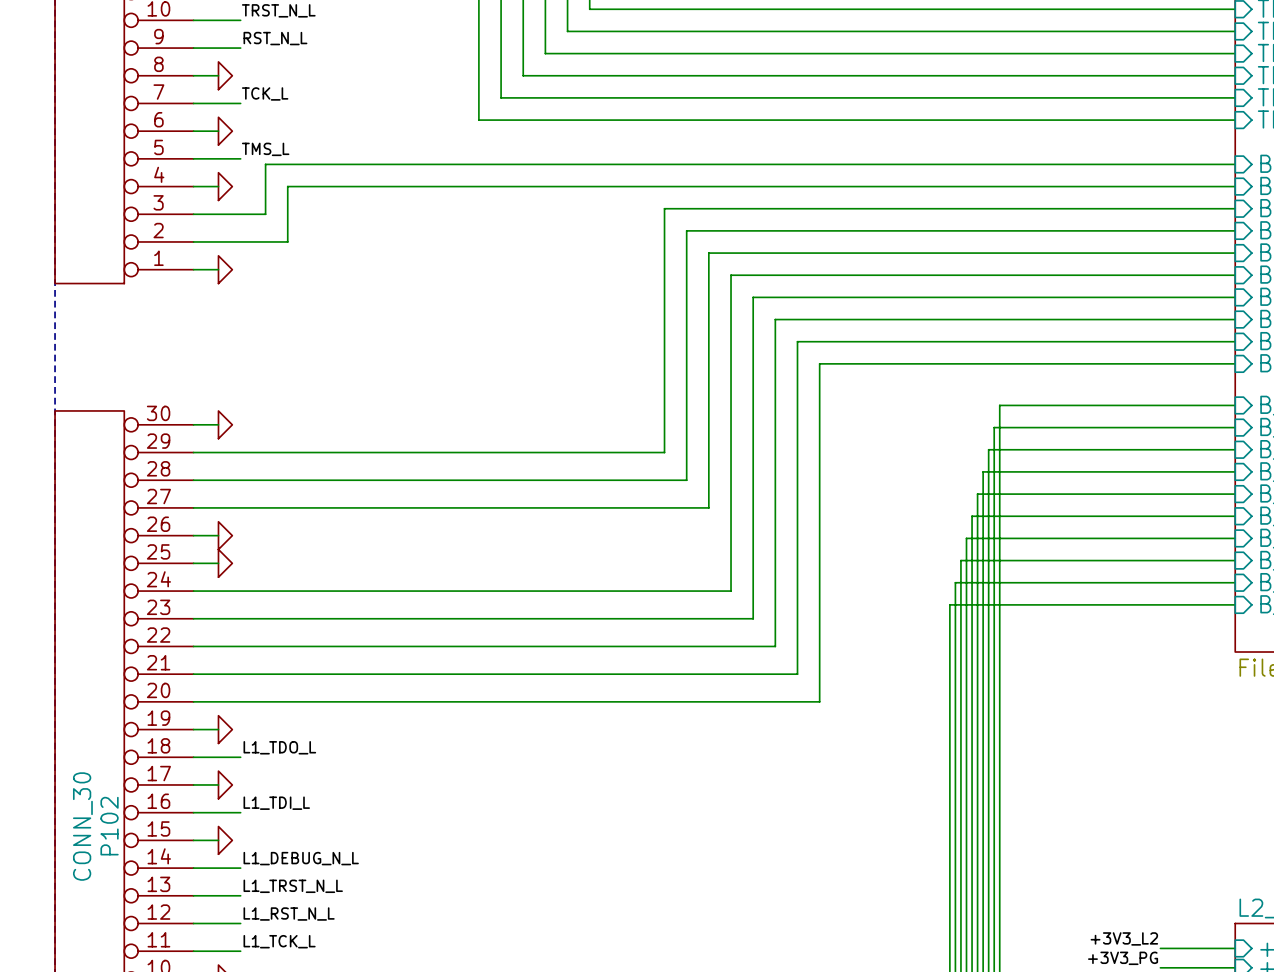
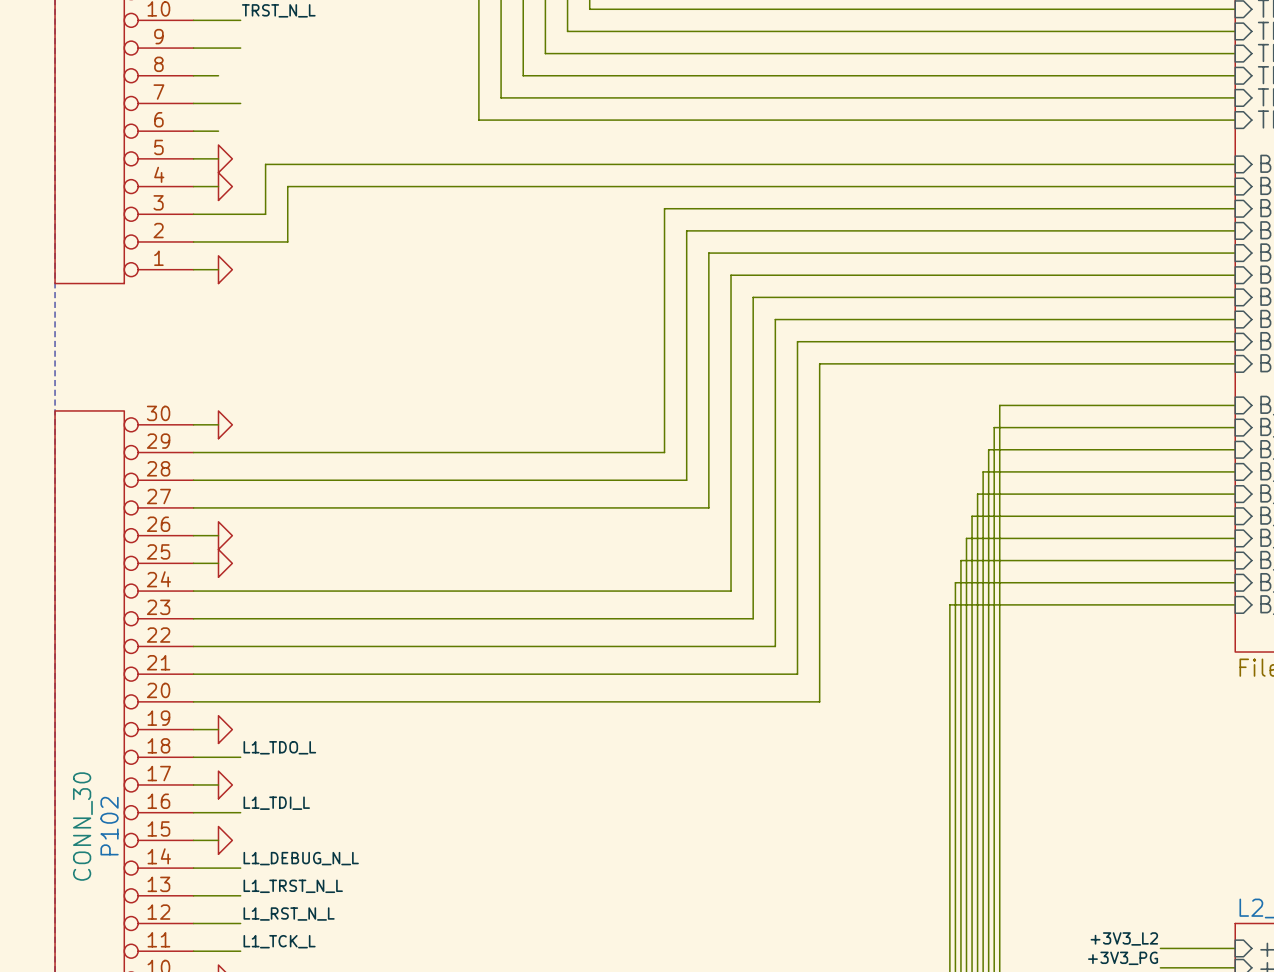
label: RST_N_L (275, 38) -> none
power symbol: (225, 75) -> none
label: TCK_L (265, 93) -> none
power symbol position: (225, 131) -> (225, 158)
label: TMS_L (265, 149) -> none
wire: (218, 158) (240, 158) -> none

